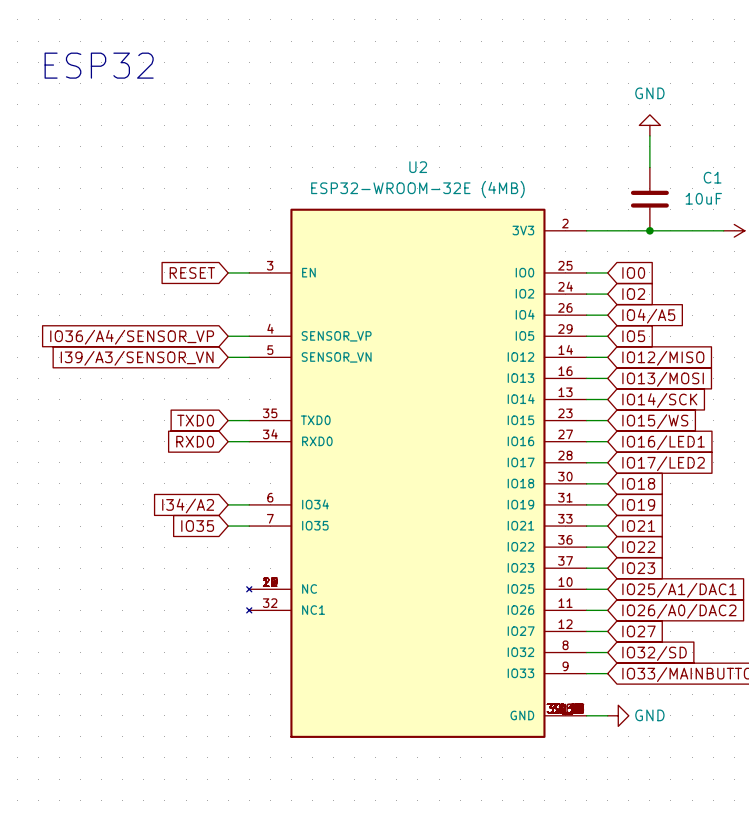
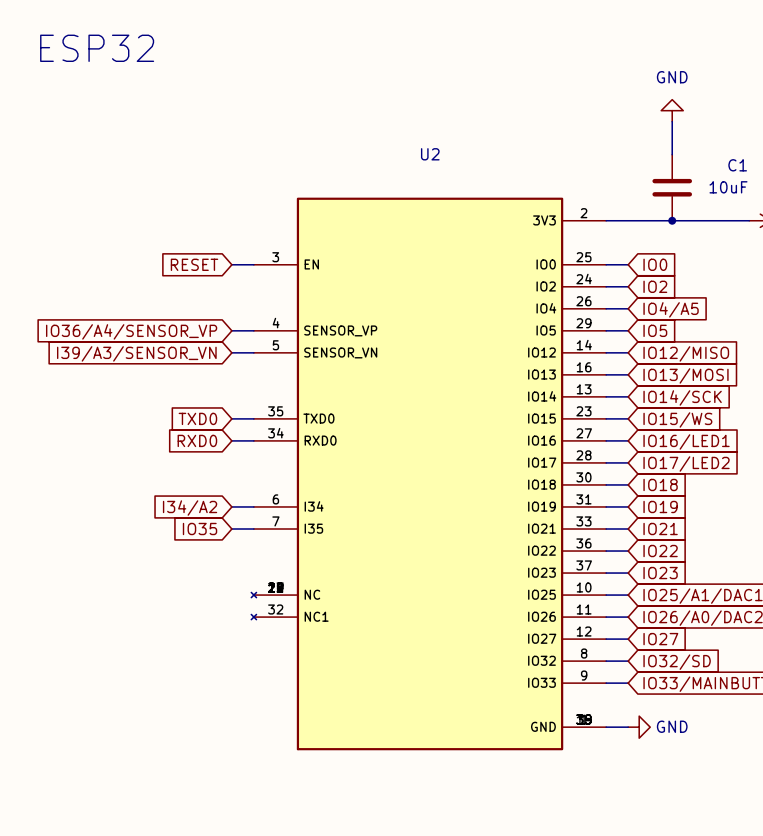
U2 value: ESP32-WROOM-32E (4MB) (417, 189) -> none
U2 symbol: [246, 208, 587, 738] -> [251, 197, 607, 751]

